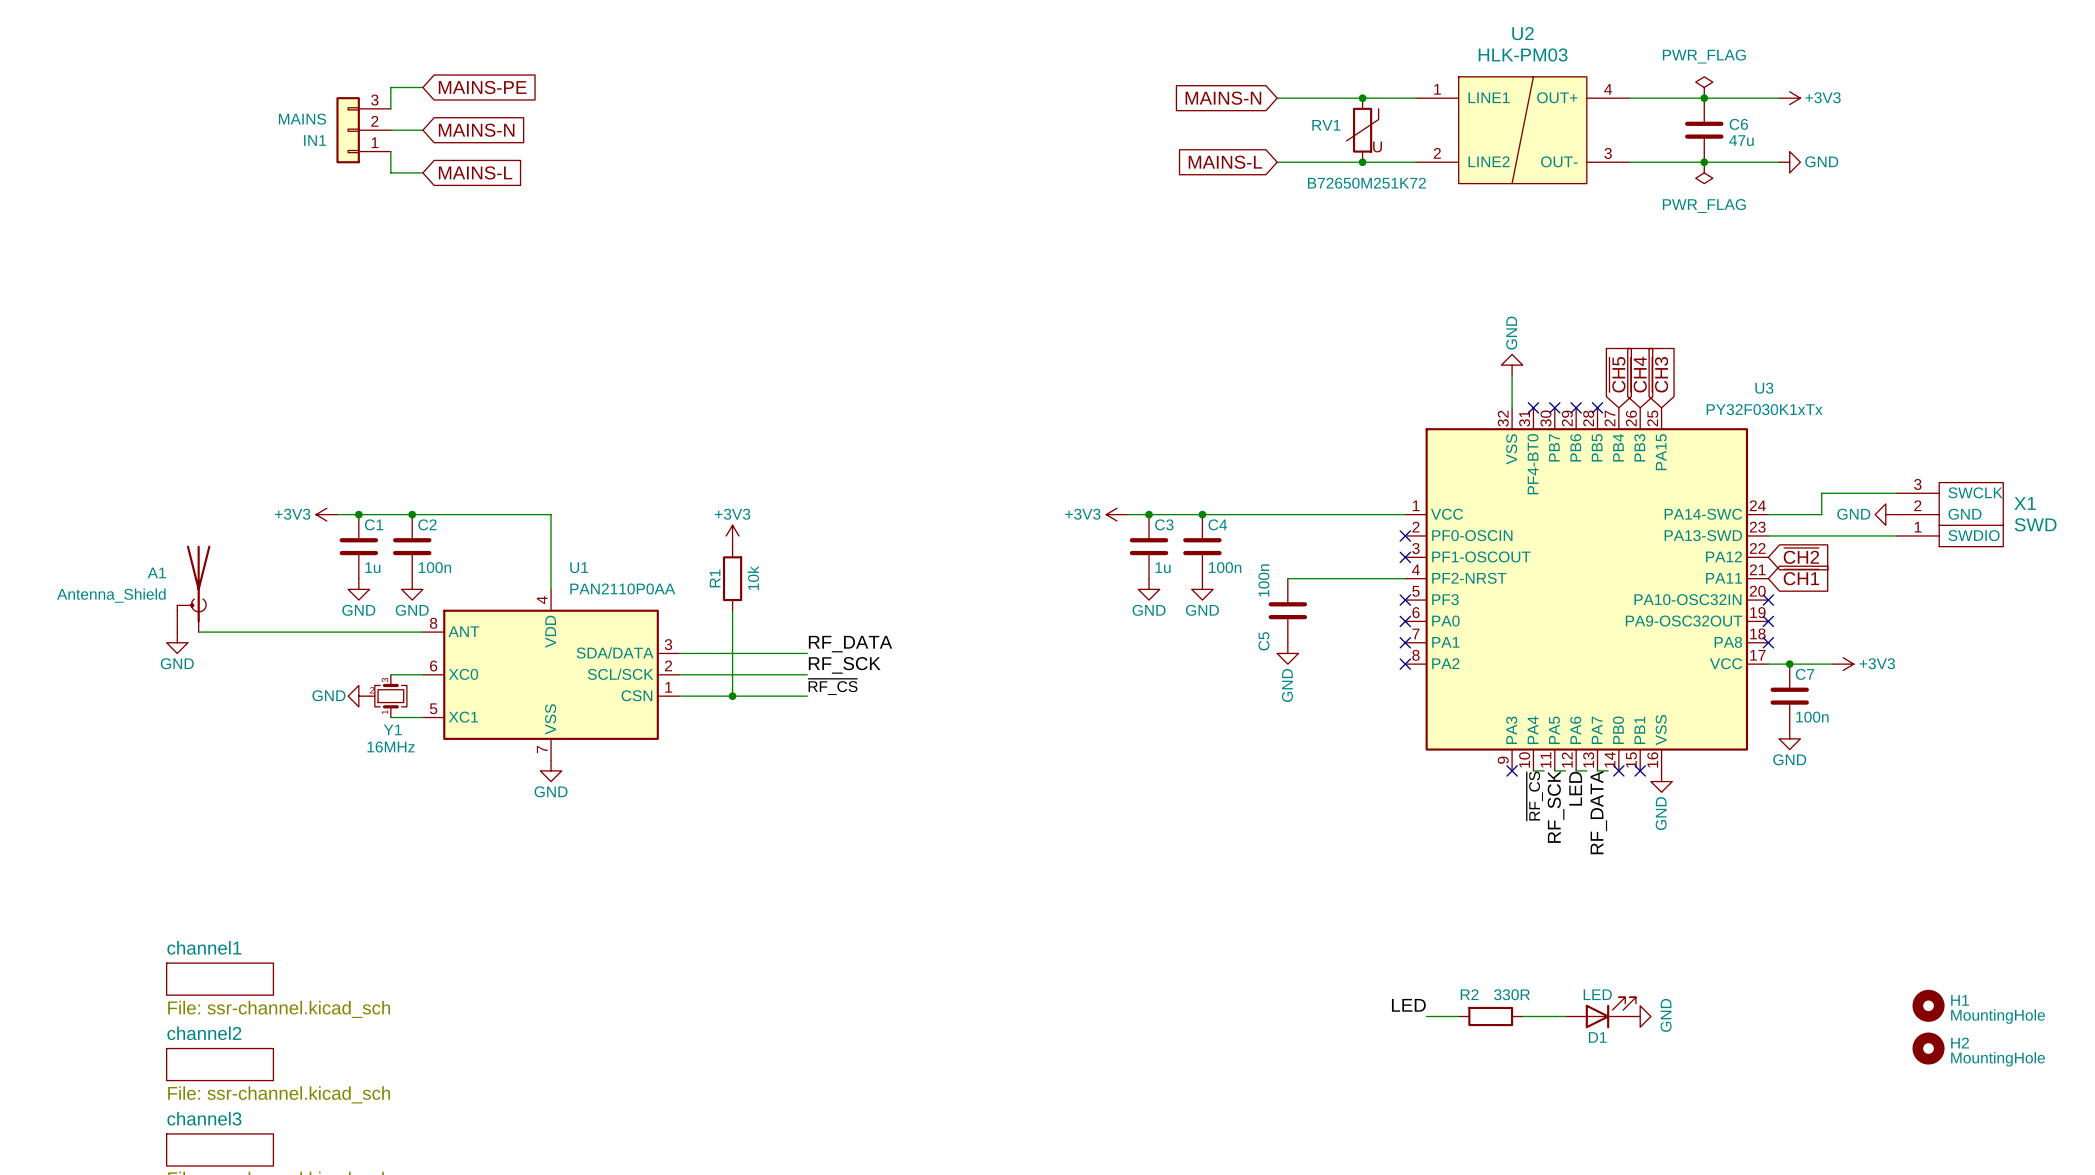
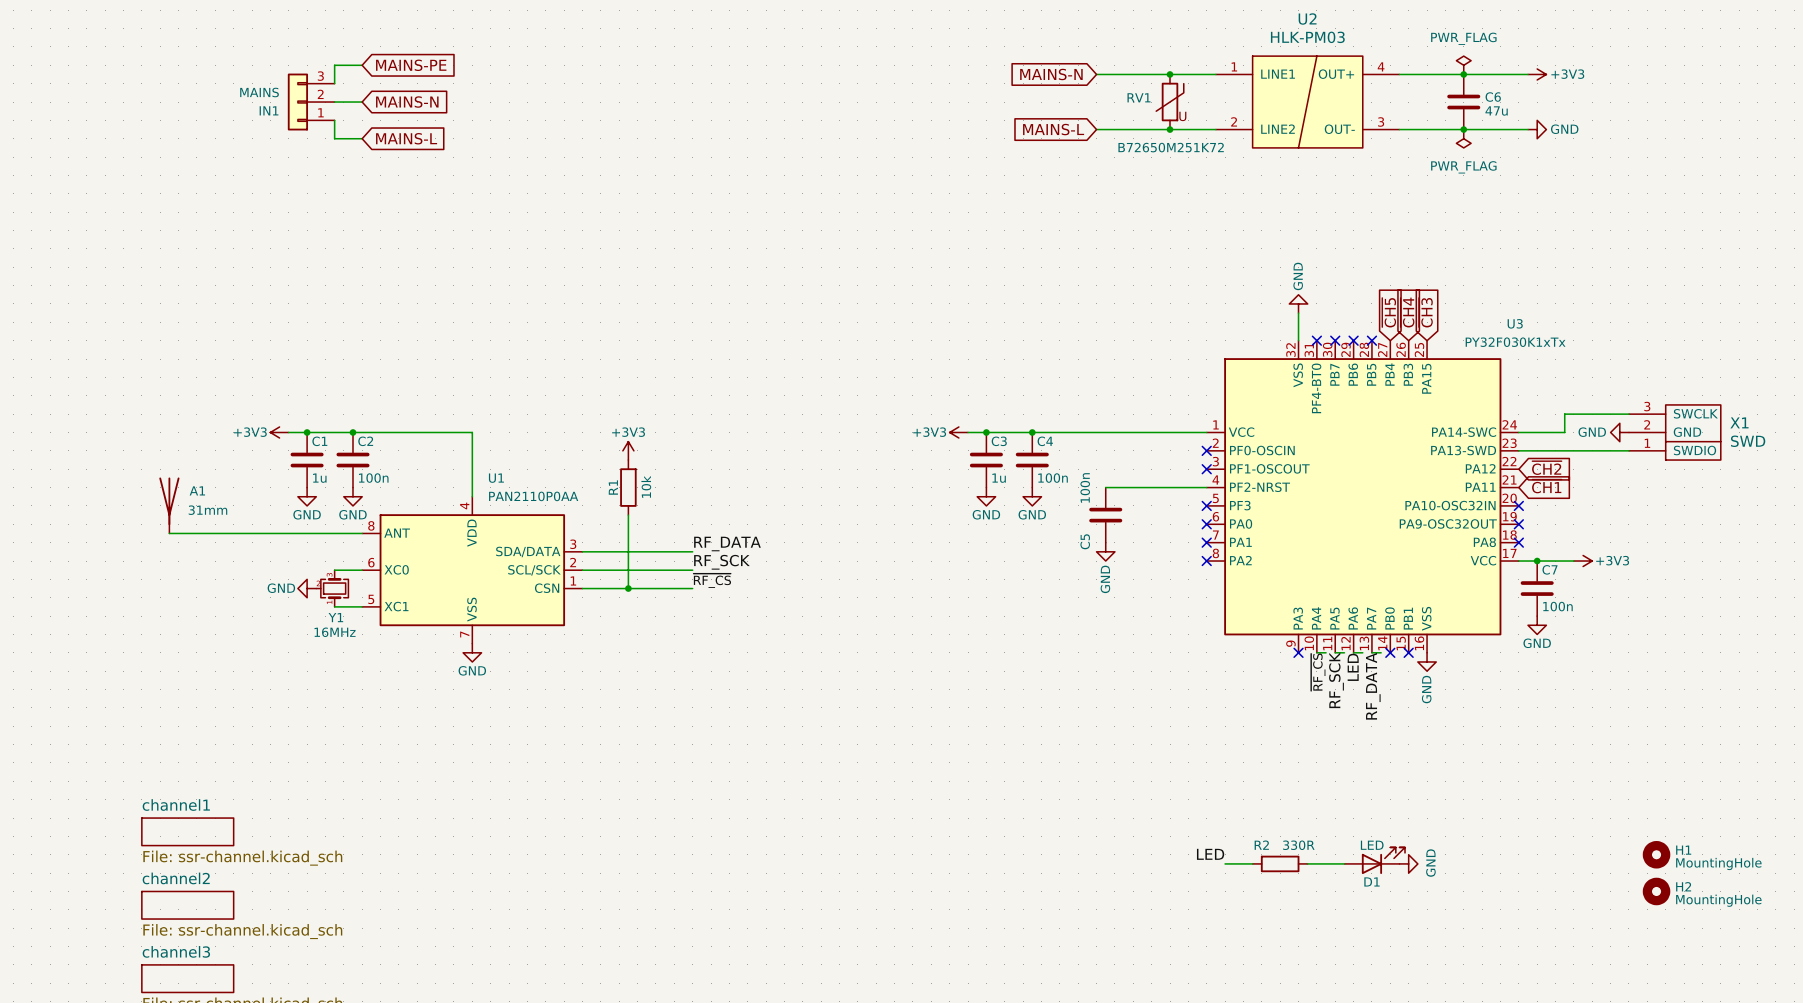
A1 symbol: [177, 545, 211, 633] -> [159, 477, 180, 534]
A1 name position: A1 (156, 572) -> A1 (197, 490)
A1 value: Antenna_Shield (111, 595) -> 31mm (207, 510)
power symbol: GND (177, 642) -> none

